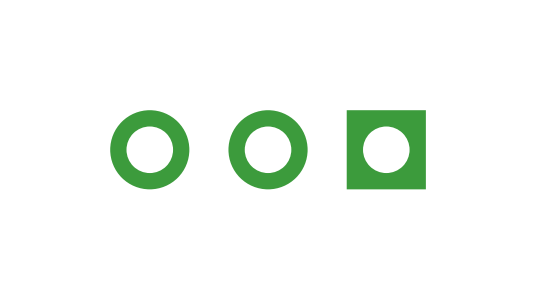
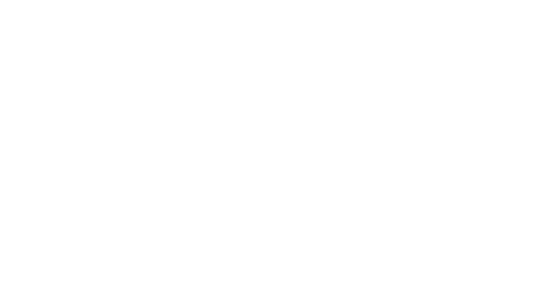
part: (268, 149) -> none

